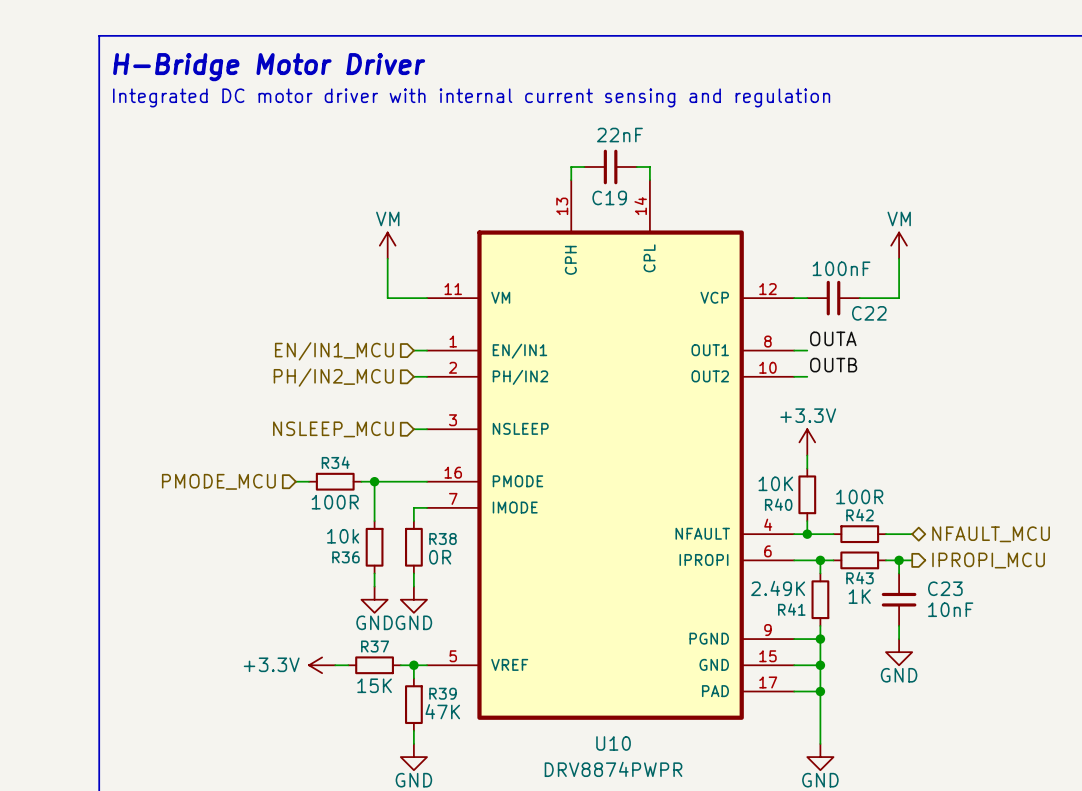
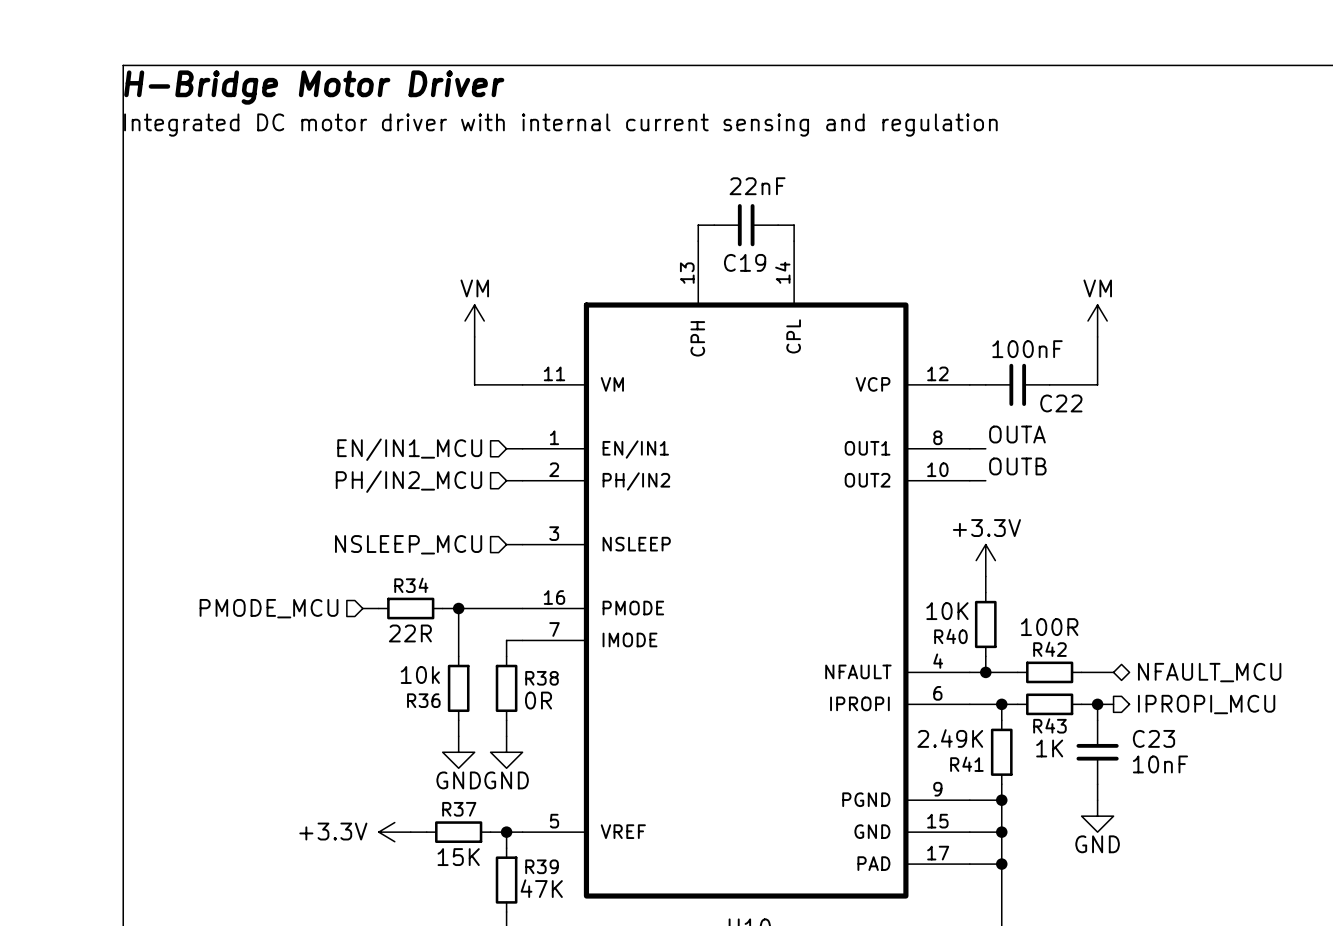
text position: H-Bridge Motor Driver (269, 67) -> H-Bridge Motor Driver (314, 87)
text position: Integrated DC motor driver with internal current sensing and regulation (471, 97) -> Integrated DC motor driver with internal current sensing and regulation (560, 125)
R34 value: 100R (335, 502) -> 22R (410, 633)

